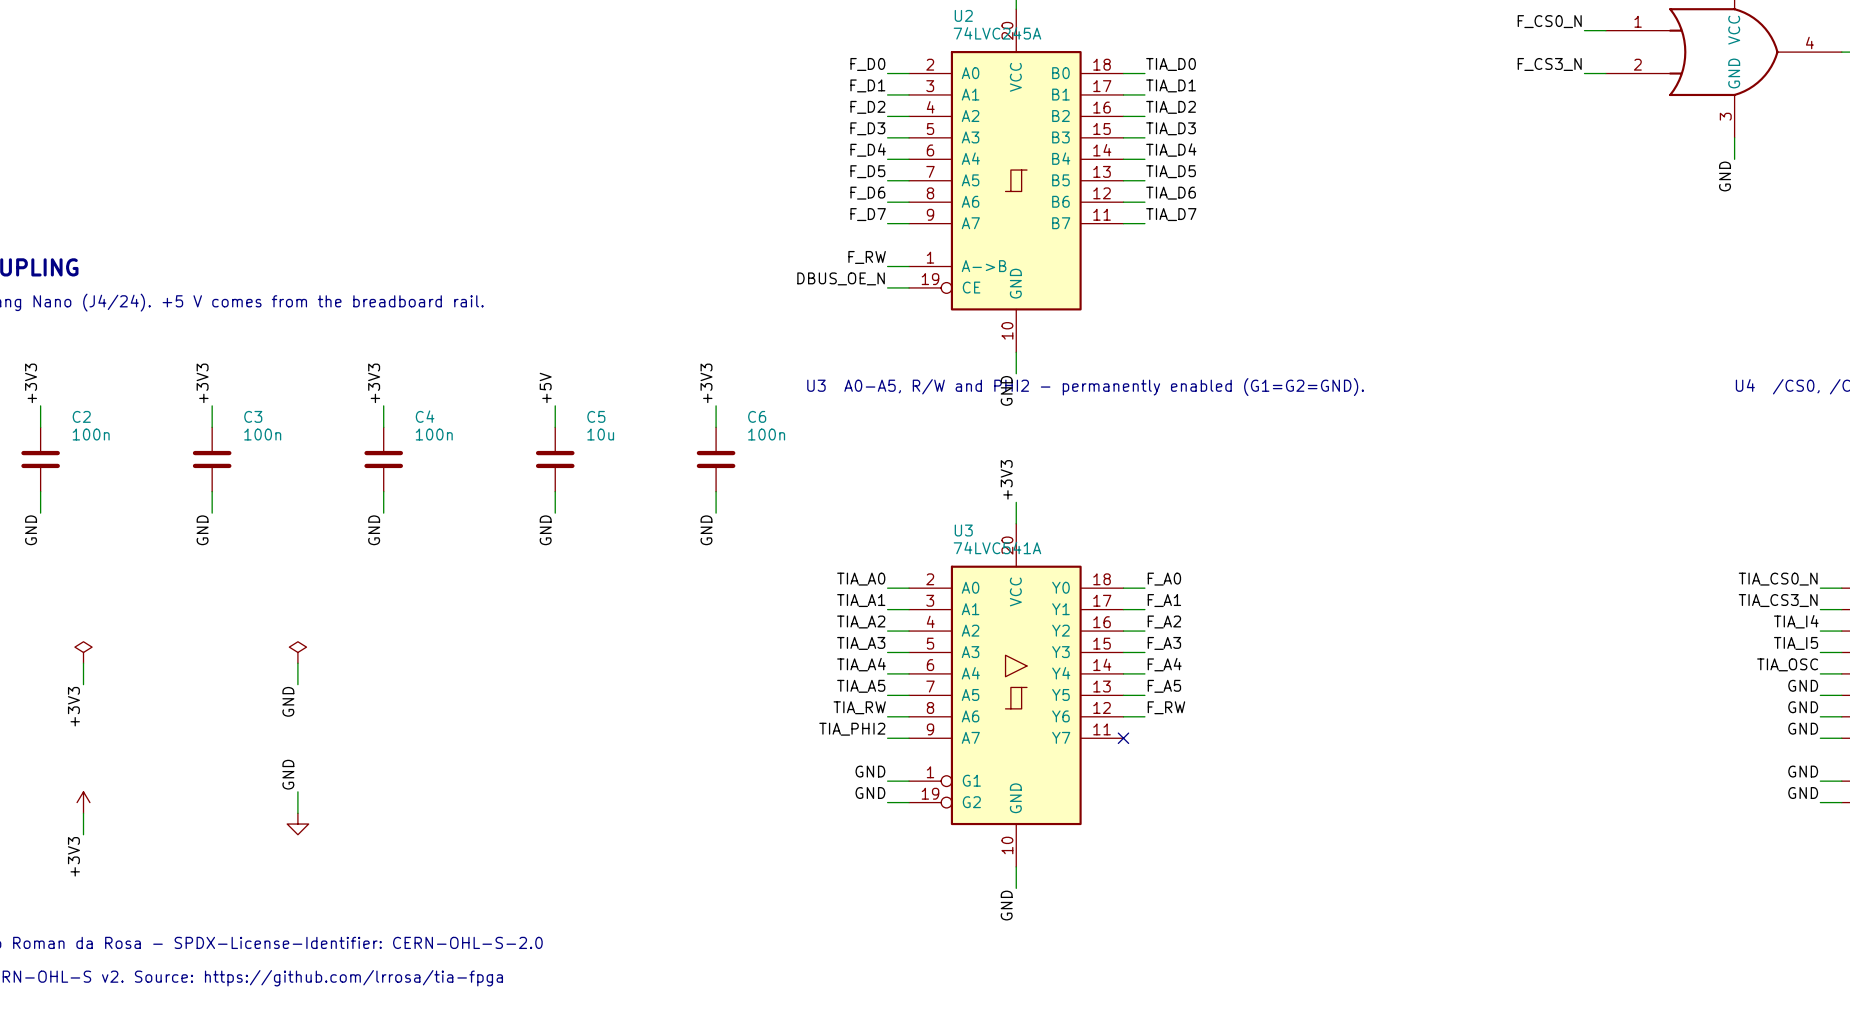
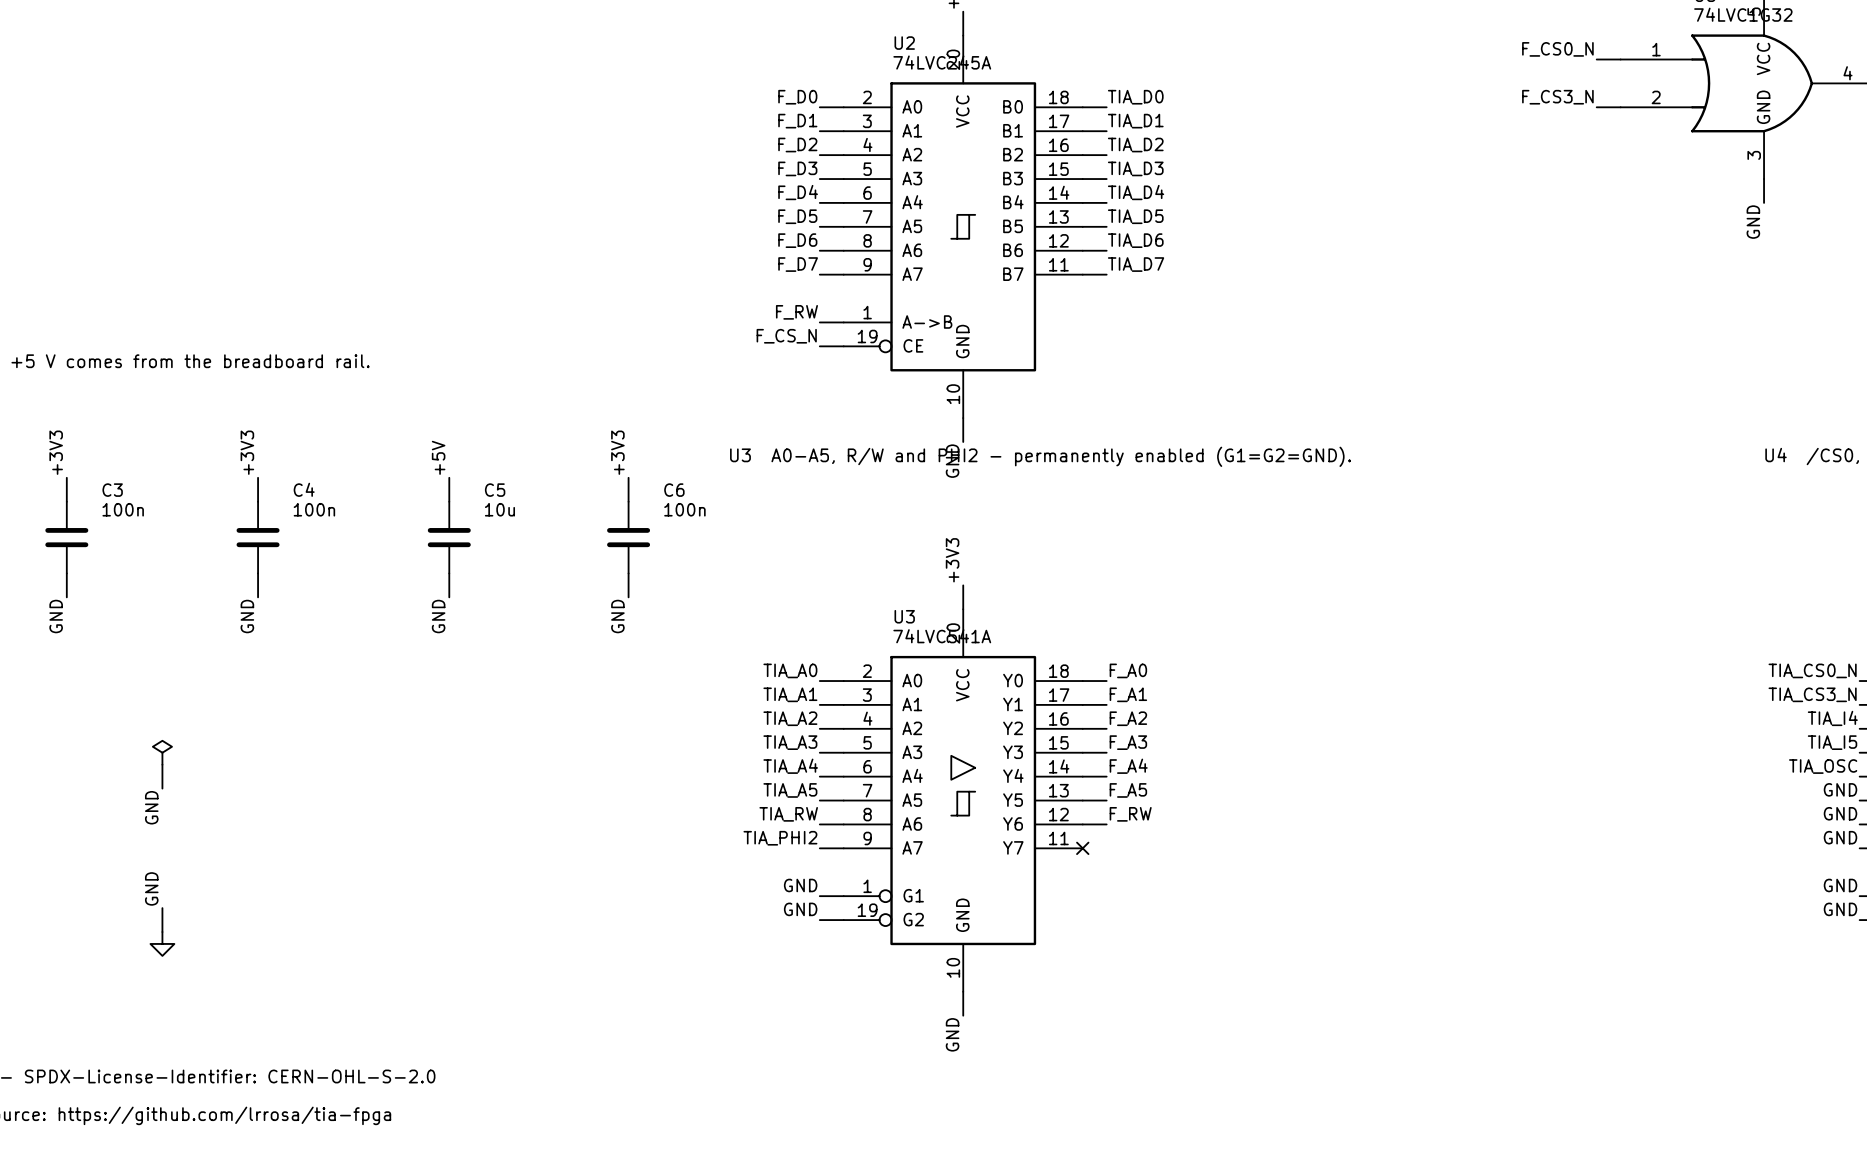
label: DBUS_OE_N (841, 278) -> F_CS_N (786, 336)

